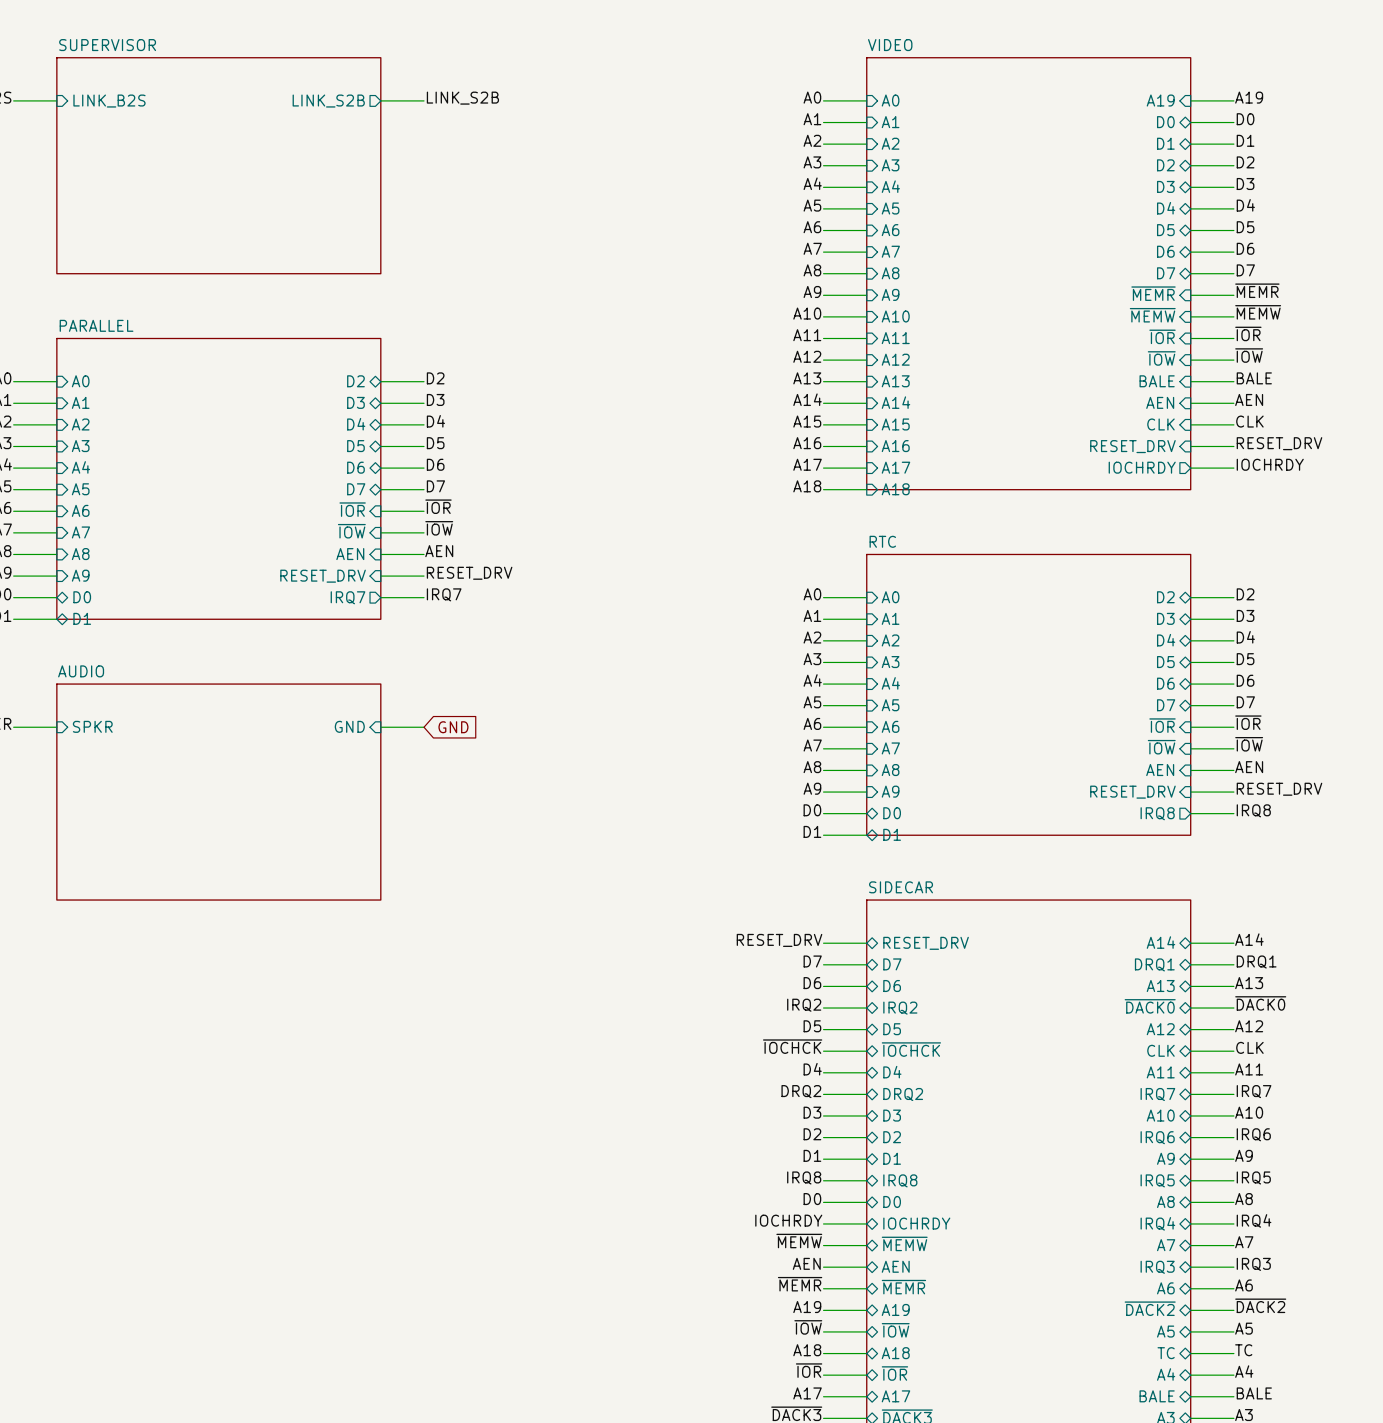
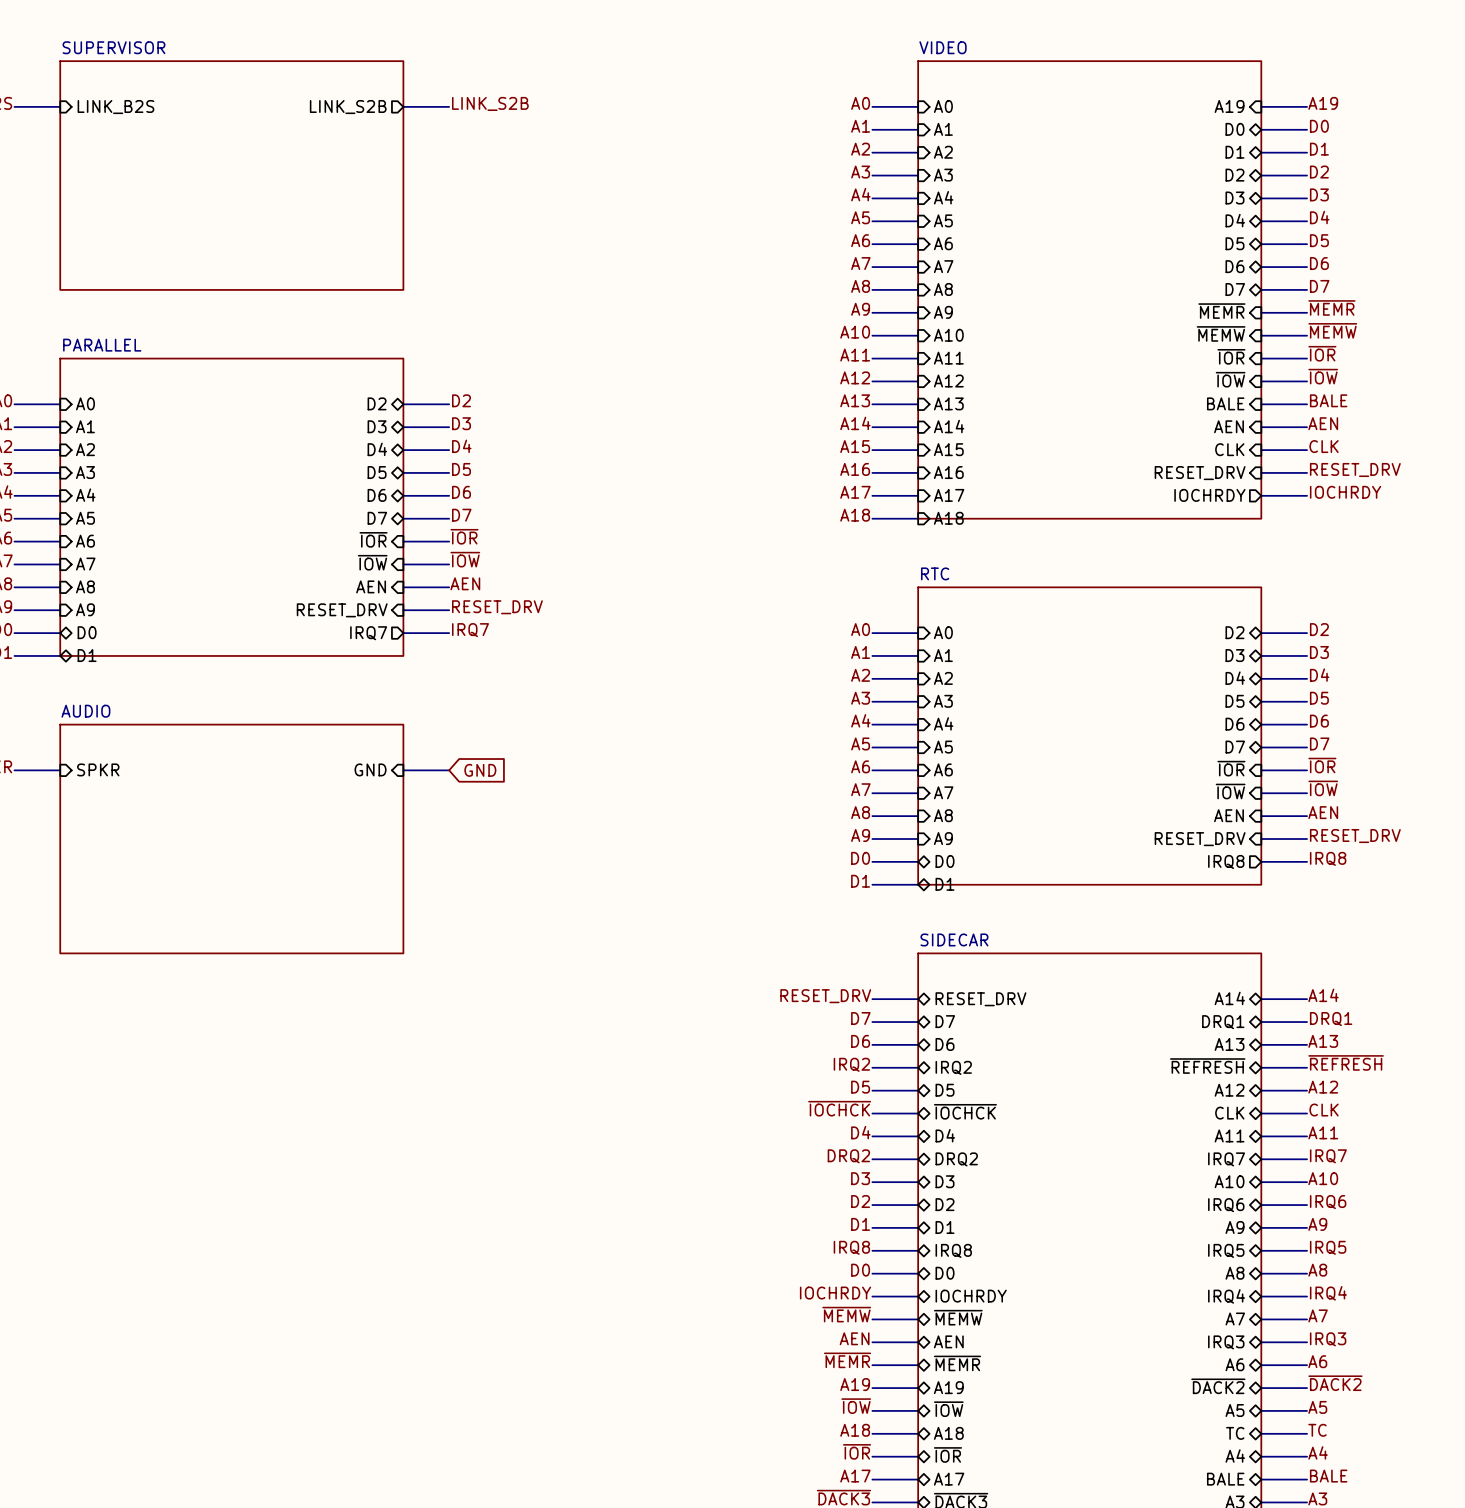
label: ~{DACK0} (1260, 1003) -> ~{REFRESH} (1346, 1062)
sheet pin: ~{DACK0} (1150, 1006) -> ~{REFRESH} (1207, 1066)

